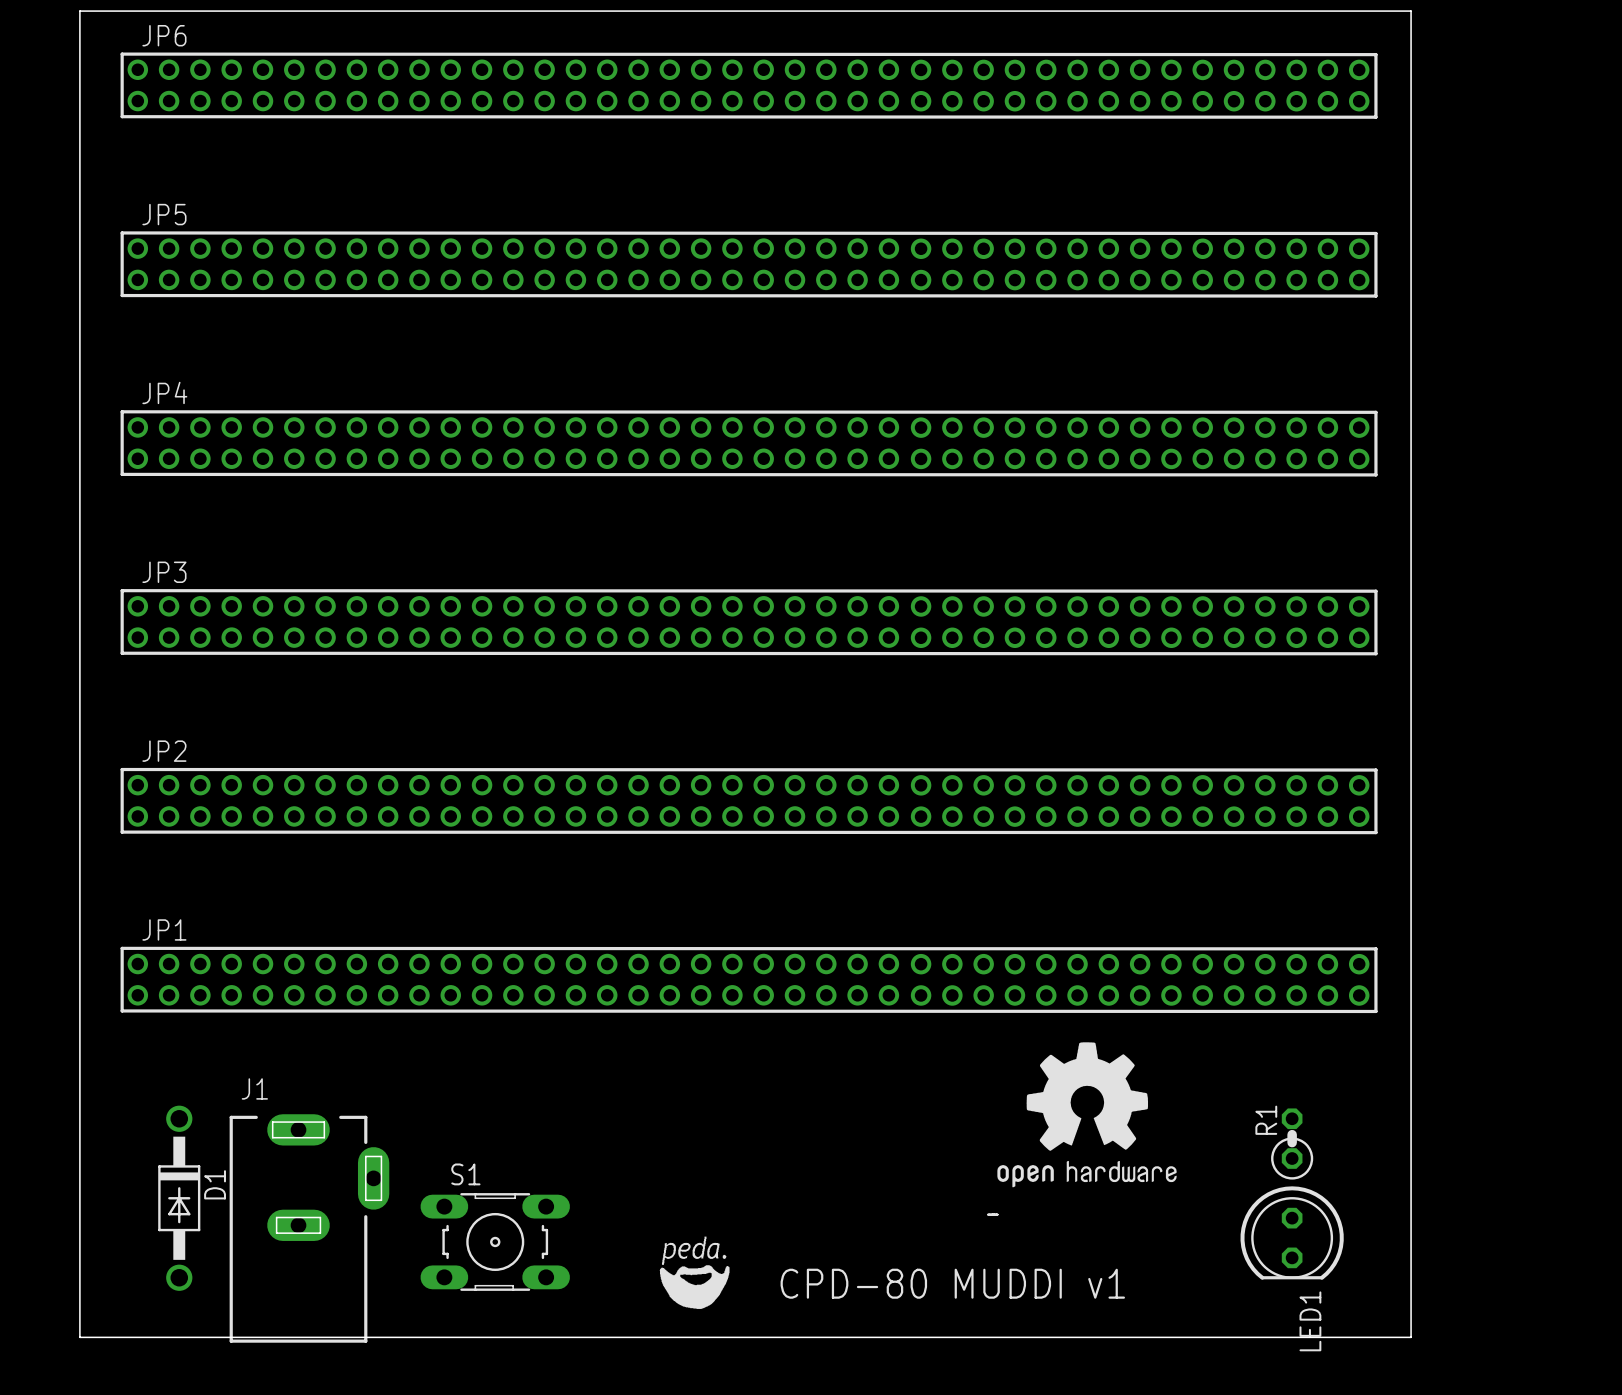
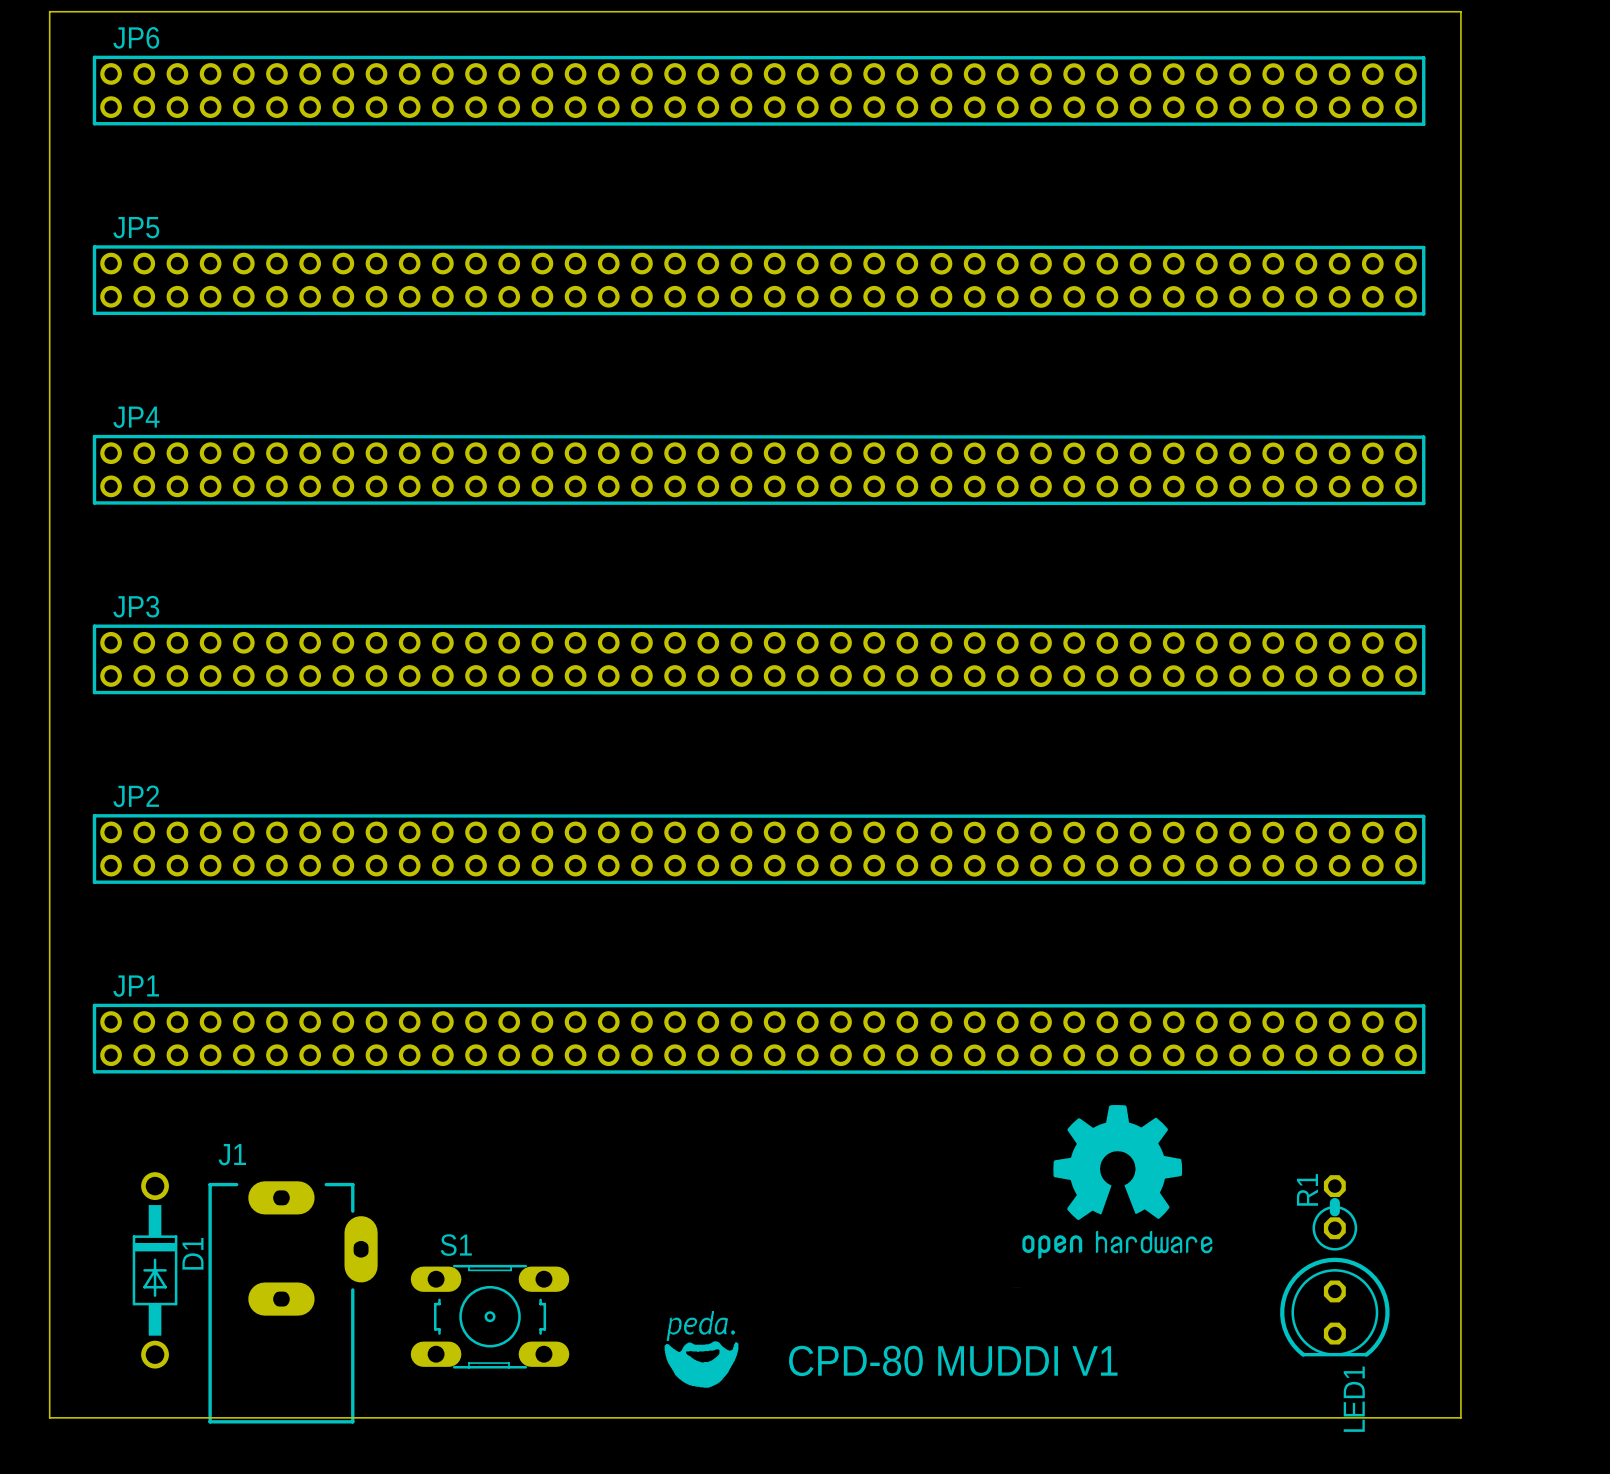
text: CPD-80 MUDDI v1 (952, 1283) -> CPD-80 MUDDI V1 (953, 1360)

